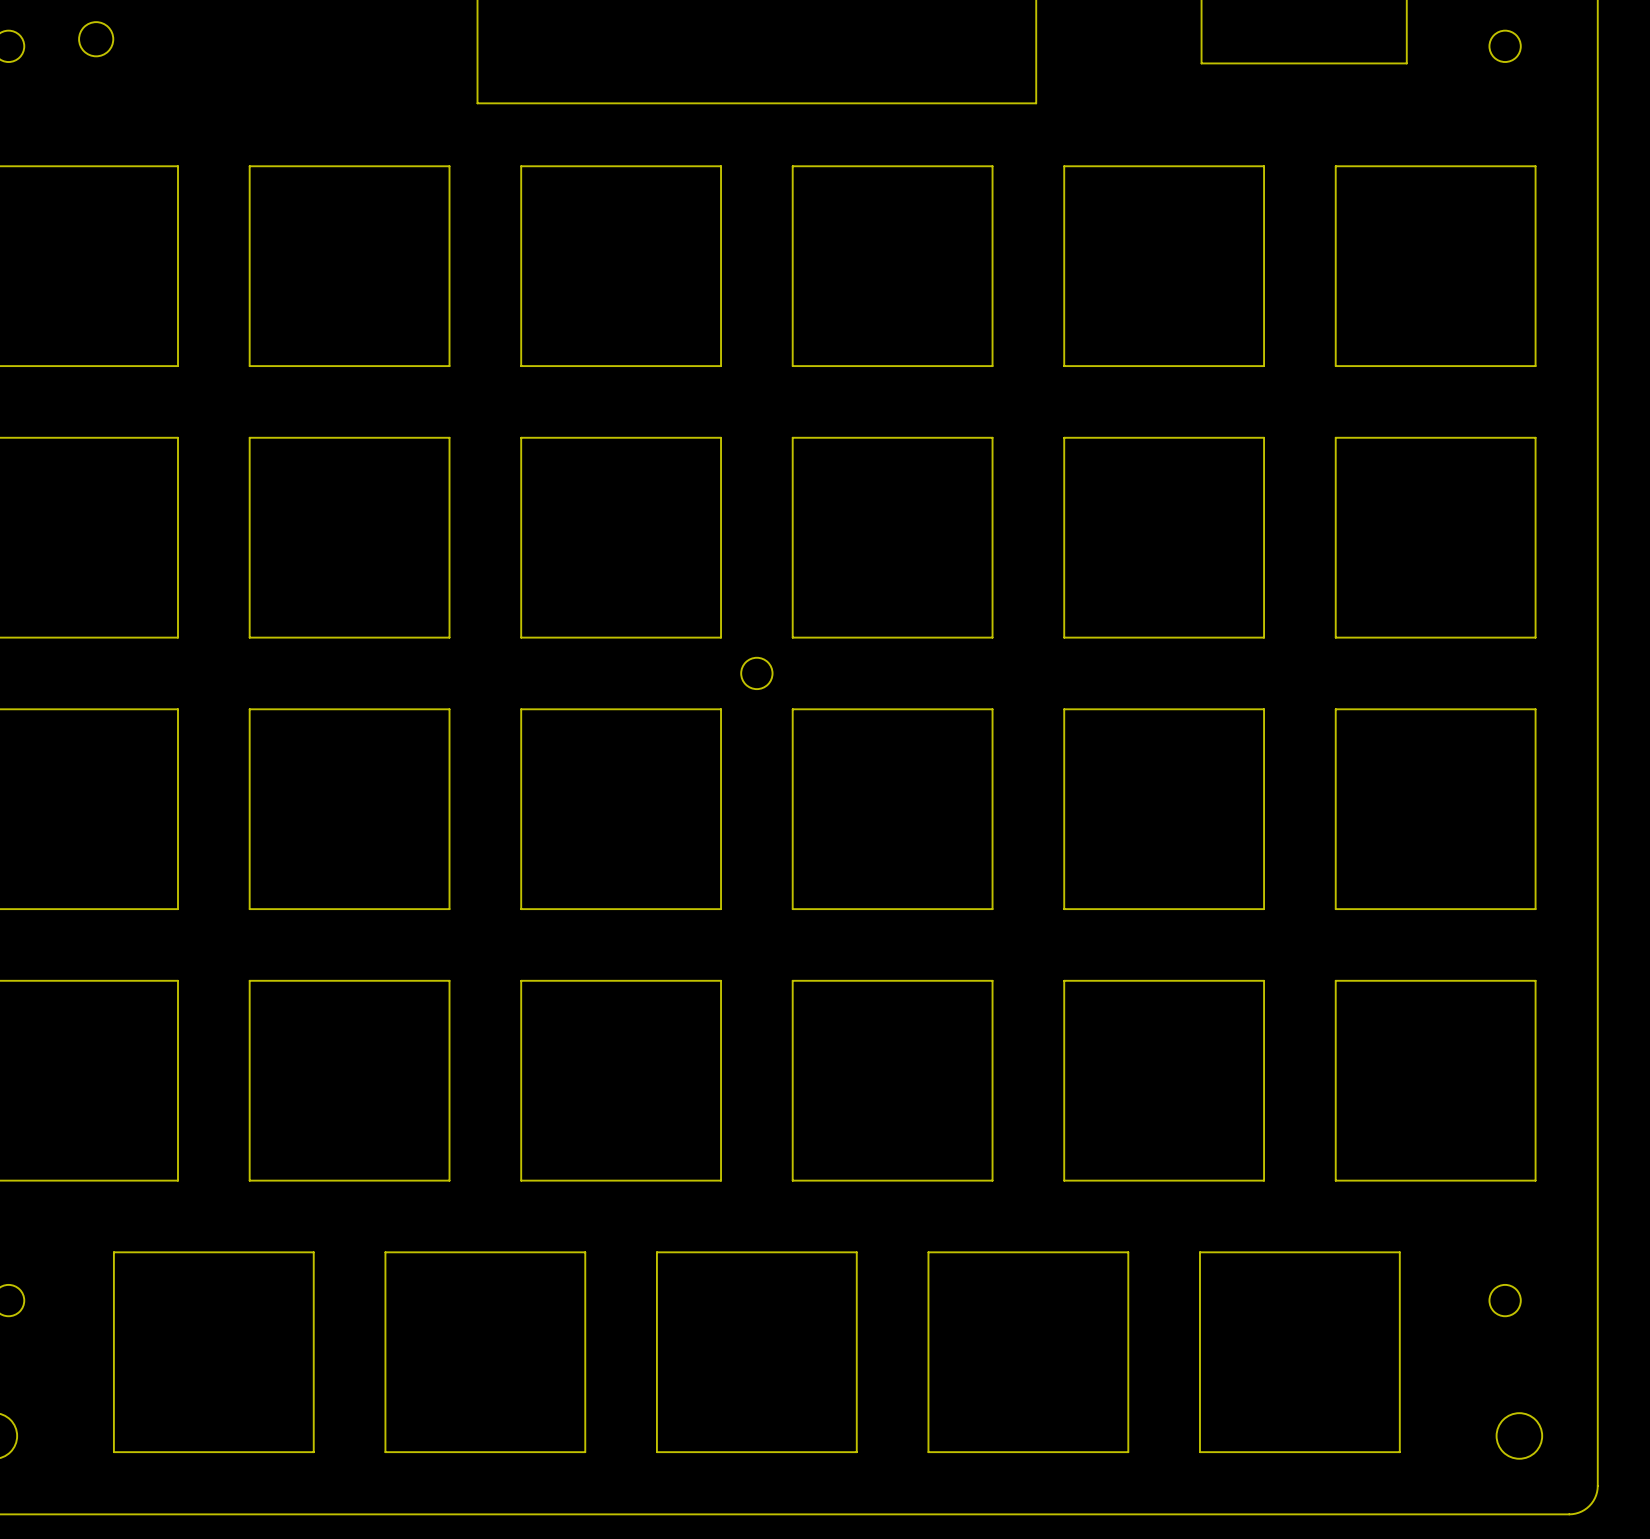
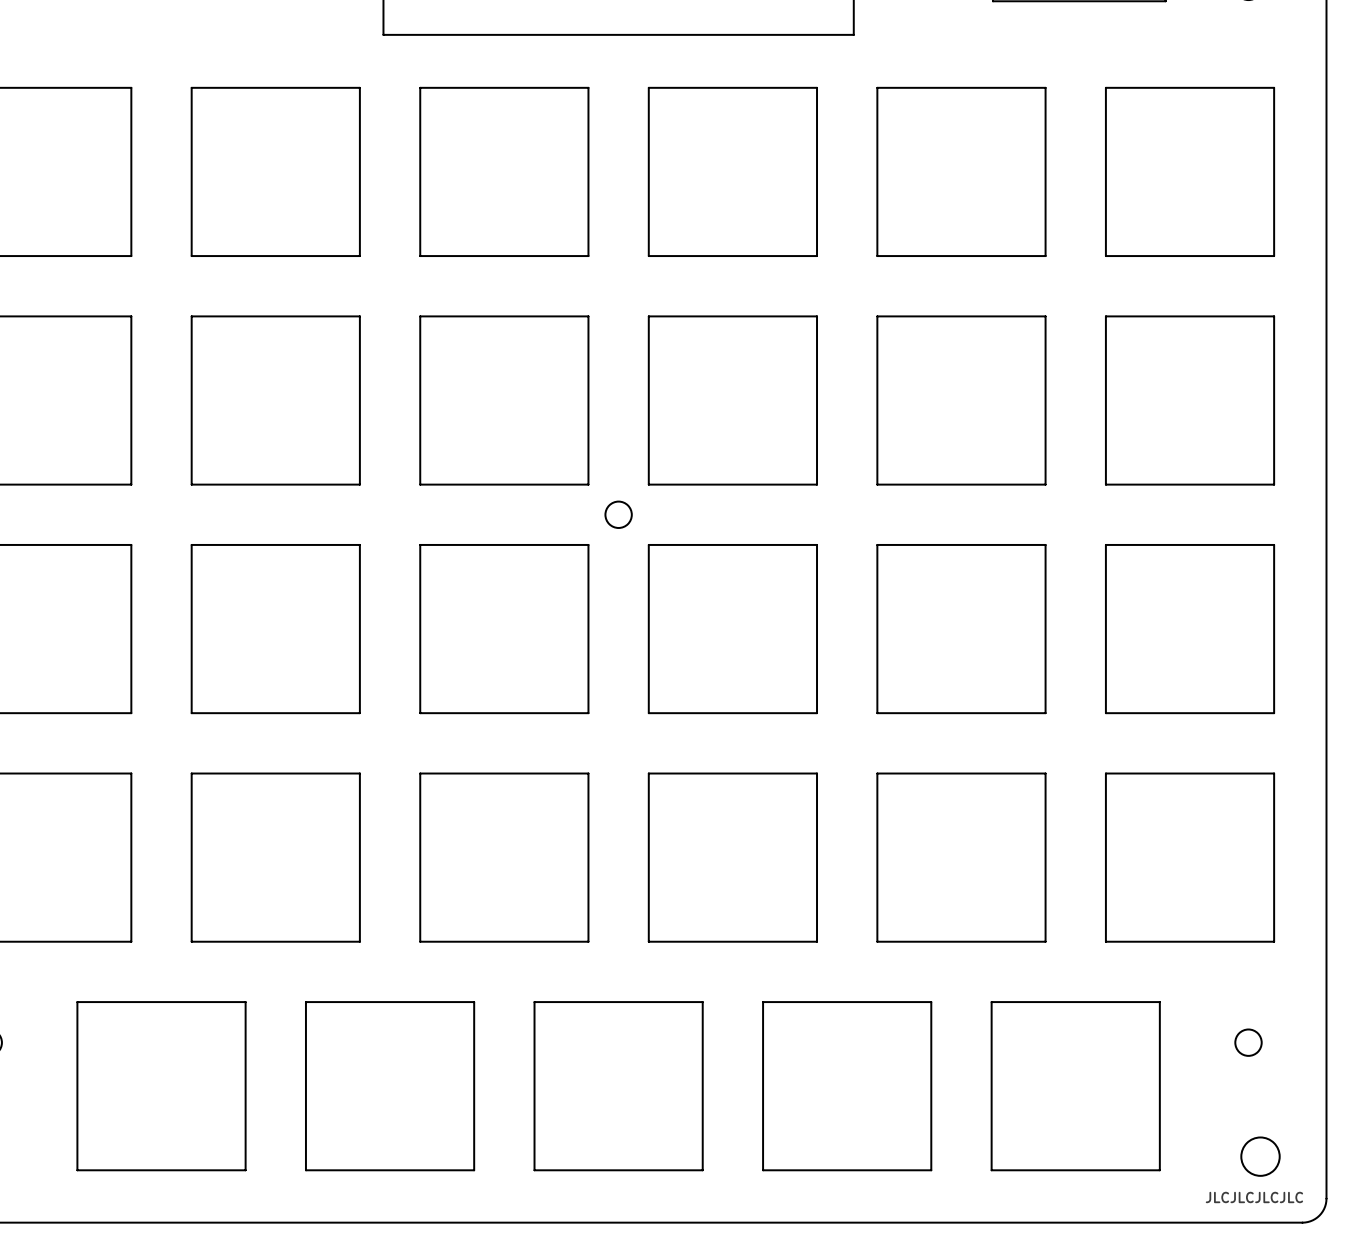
text: none -> JLCJLCJLCJLC (1254, 1197)

